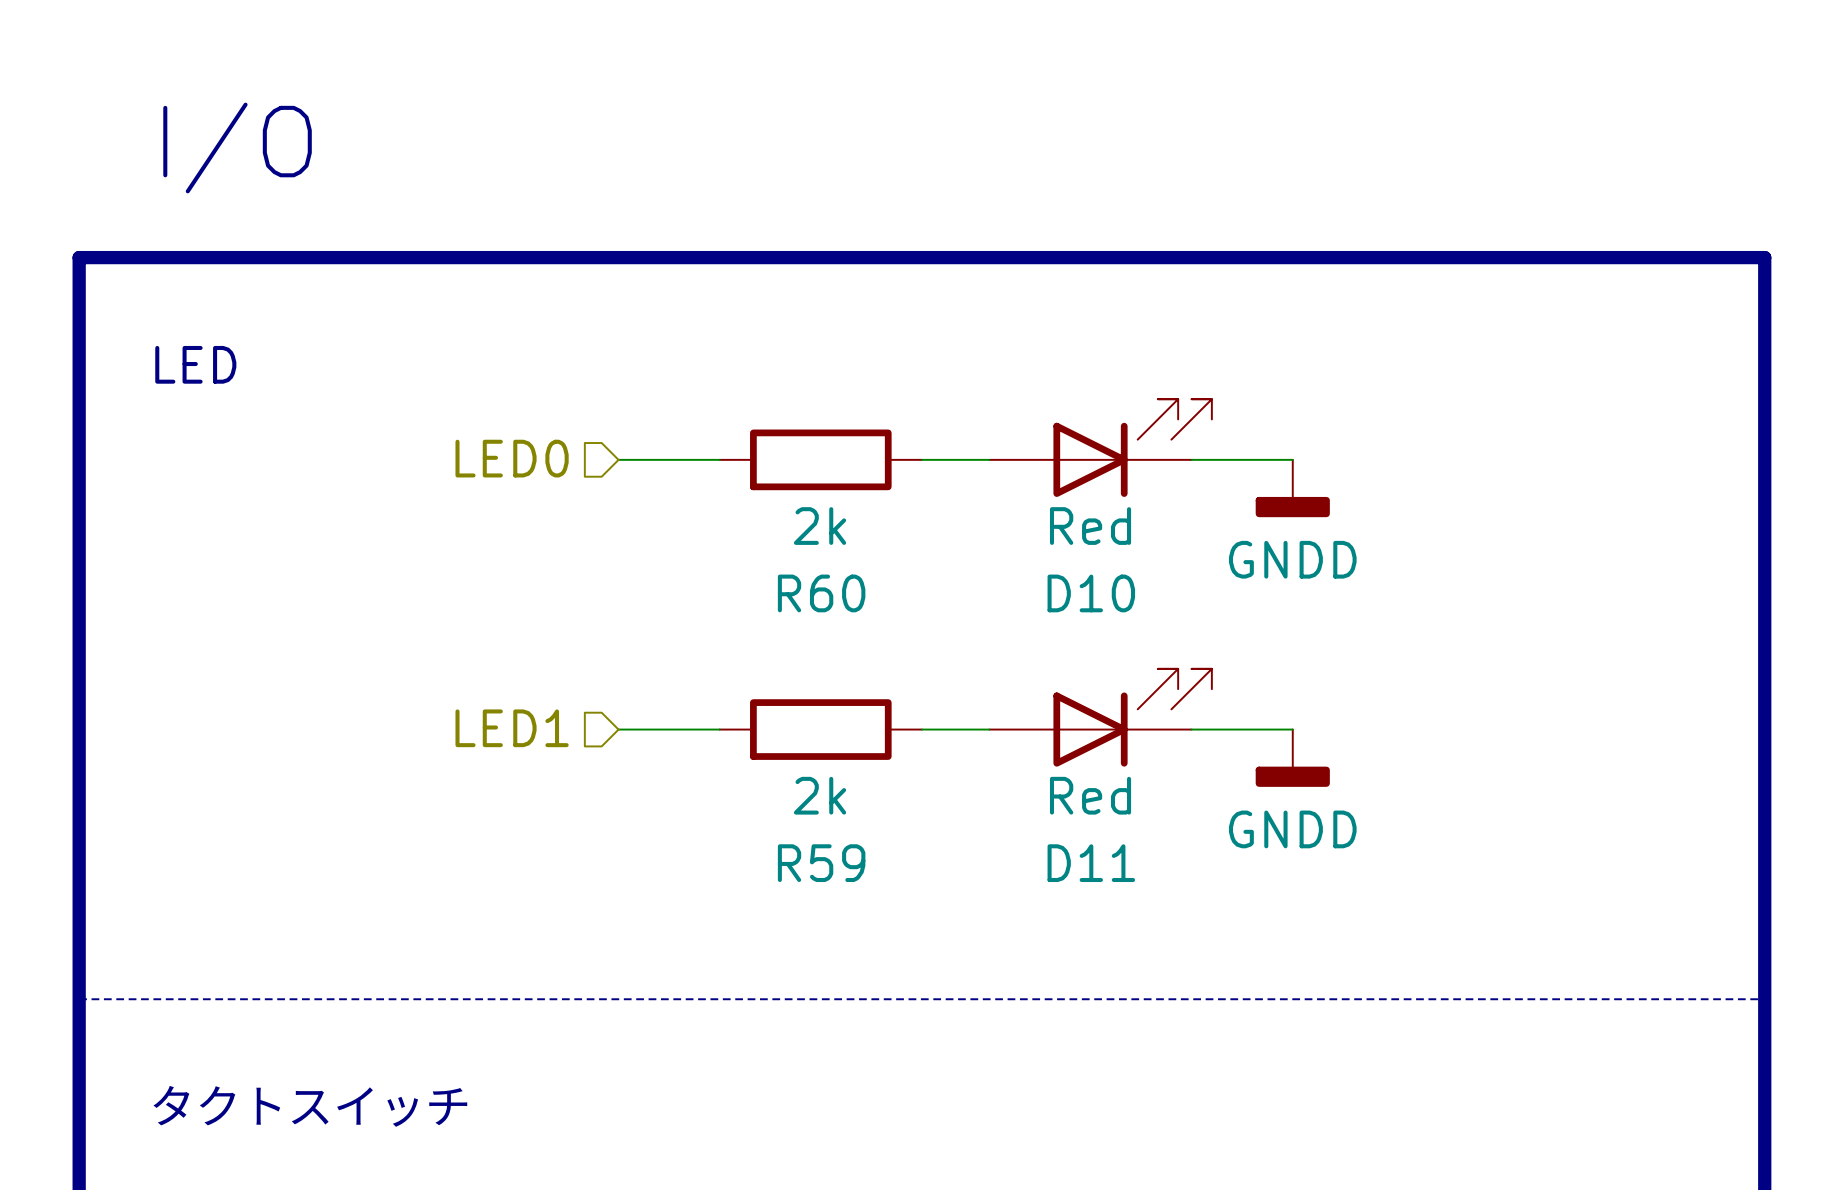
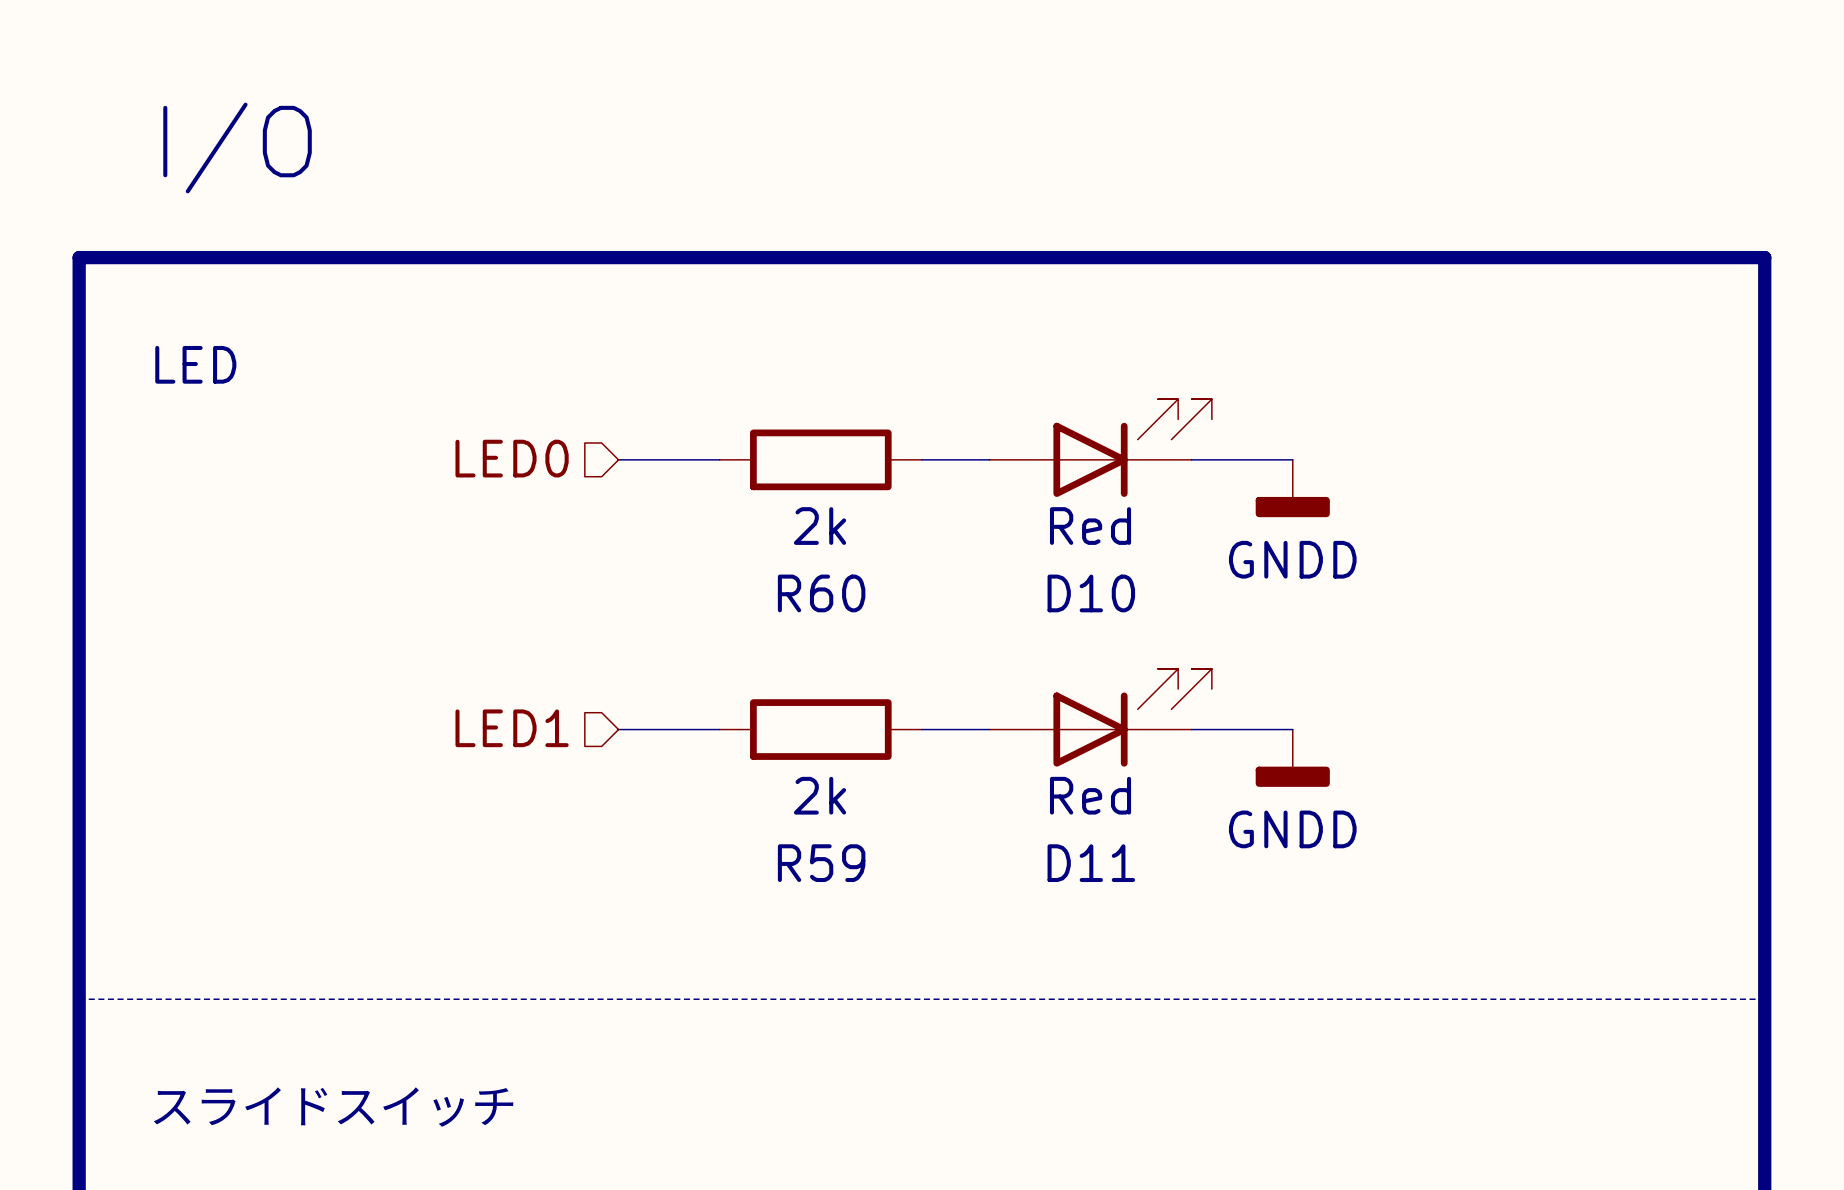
text: タクトスイッチ (310, 1106) -> スライドスイッチ (333, 1107)

